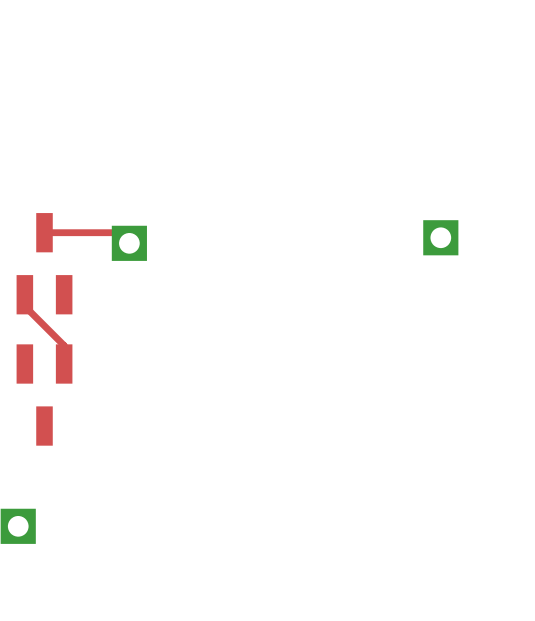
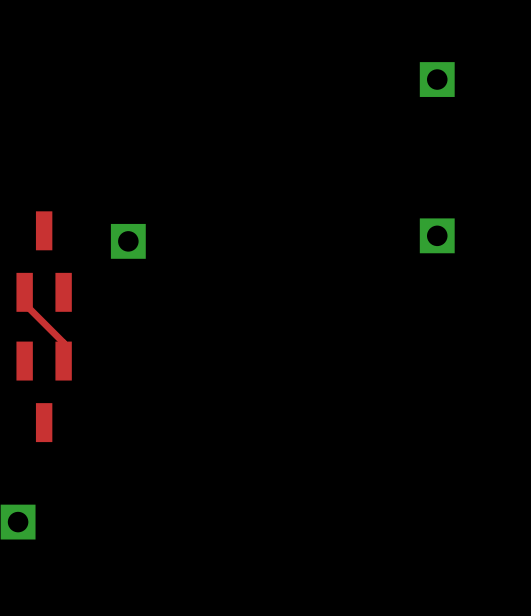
part: none -> (437, 79)
top track: (44, 232) (119, 232) (129, 243) -> none

